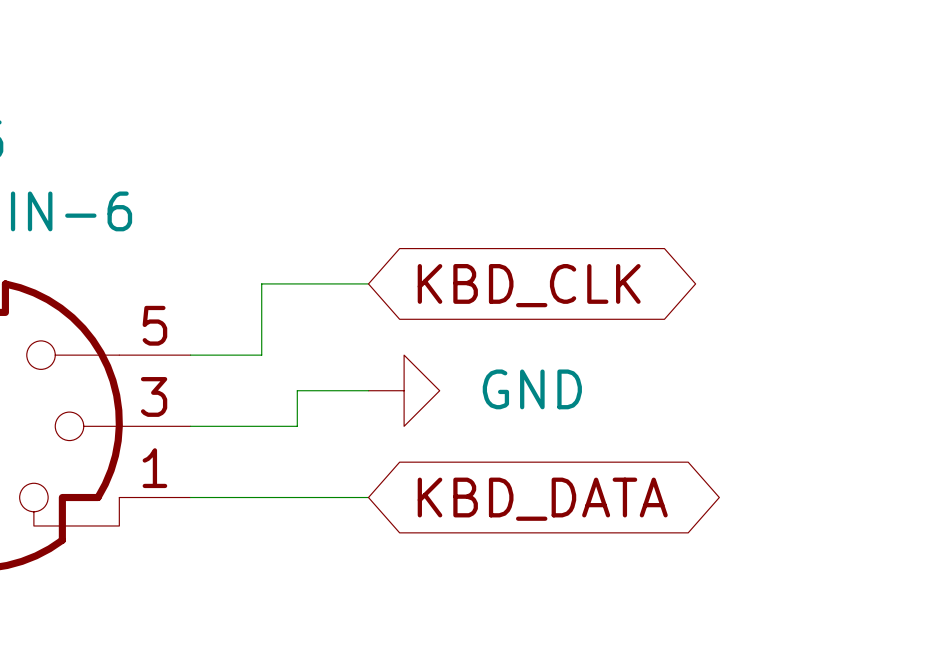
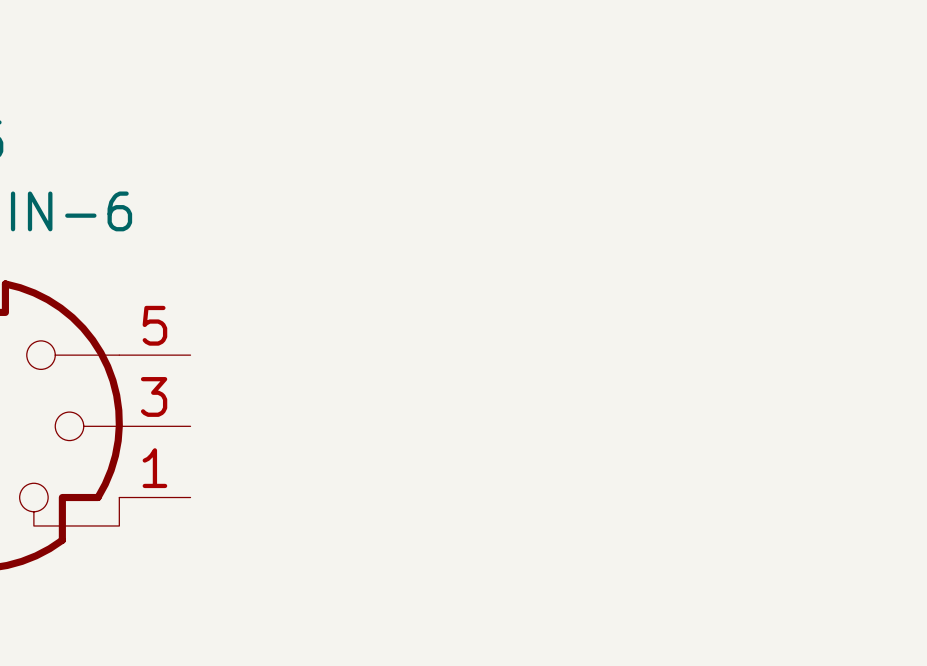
wire: (368, 283) (261, 283) (261, 355) (190, 355) -> none
global label: KBD_CLK (529, 285) -> none
wire: (368, 390) (297, 390) (297, 426) (190, 426) -> none
power symbol: GND (404, 390) -> none
wire: (190, 497) (368, 497) -> none
global label: KBD_DATA (542, 499) -> none

